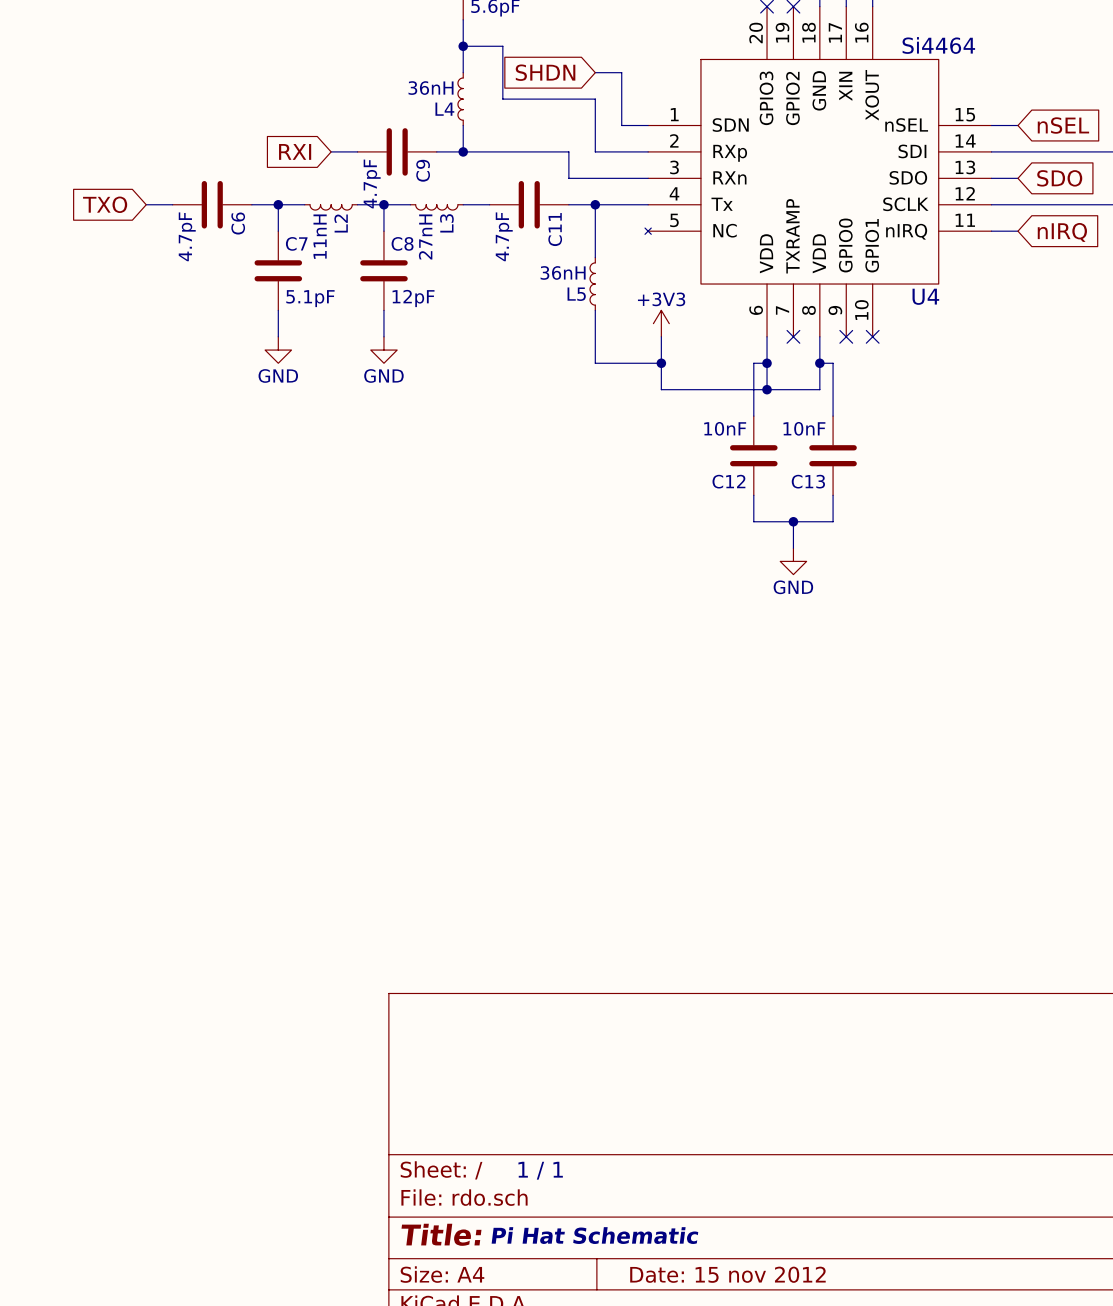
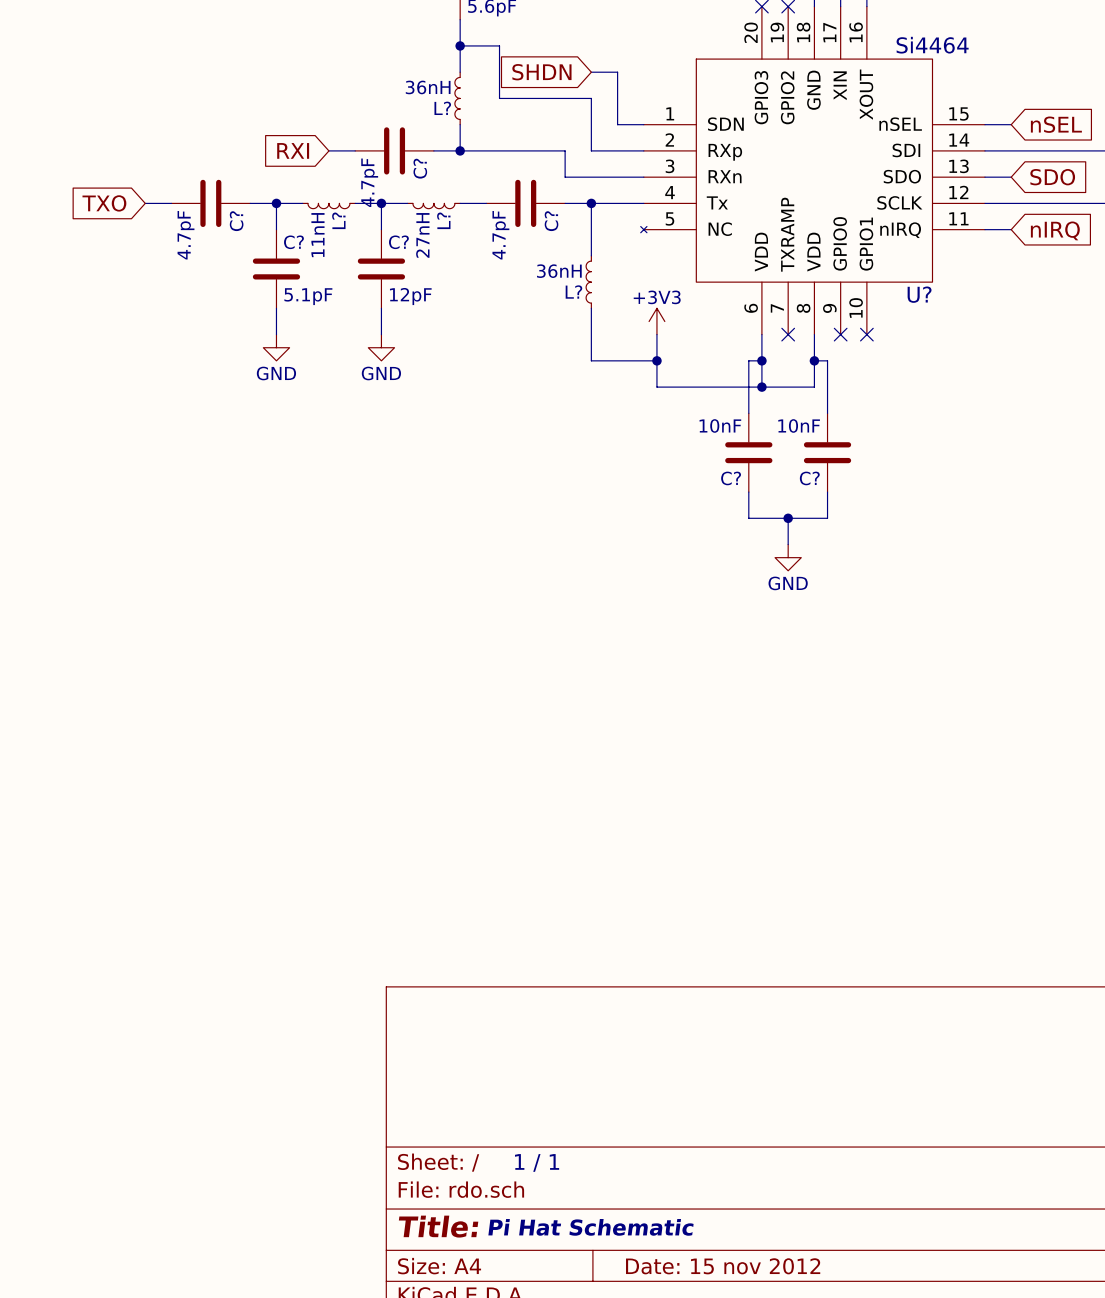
L4 name: L4 (444, 109) -> L? (442, 108)
C9 name: C9 (423, 170) -> C? (420, 168)
C6 name: C6 (238, 223) -> C? (236, 221)
L2 name: L2 (341, 223) -> L? (338, 220)
L3 name: L3 (446, 223) -> L? (443, 220)
C11 name: C11 (555, 229) -> C? (551, 221)
C7 name: C7 (296, 243) -> C? (293, 242)
C8 name: C8 (402, 243) -> C? (398, 242)
L5 name: L5 (576, 294) -> L? (573, 292)
U4 name: U4 (925, 296) -> U? (919, 294)
C12 name: C12 (728, 481) -> C? (731, 478)
C13 name: C13 (808, 481) -> C? (809, 478)

